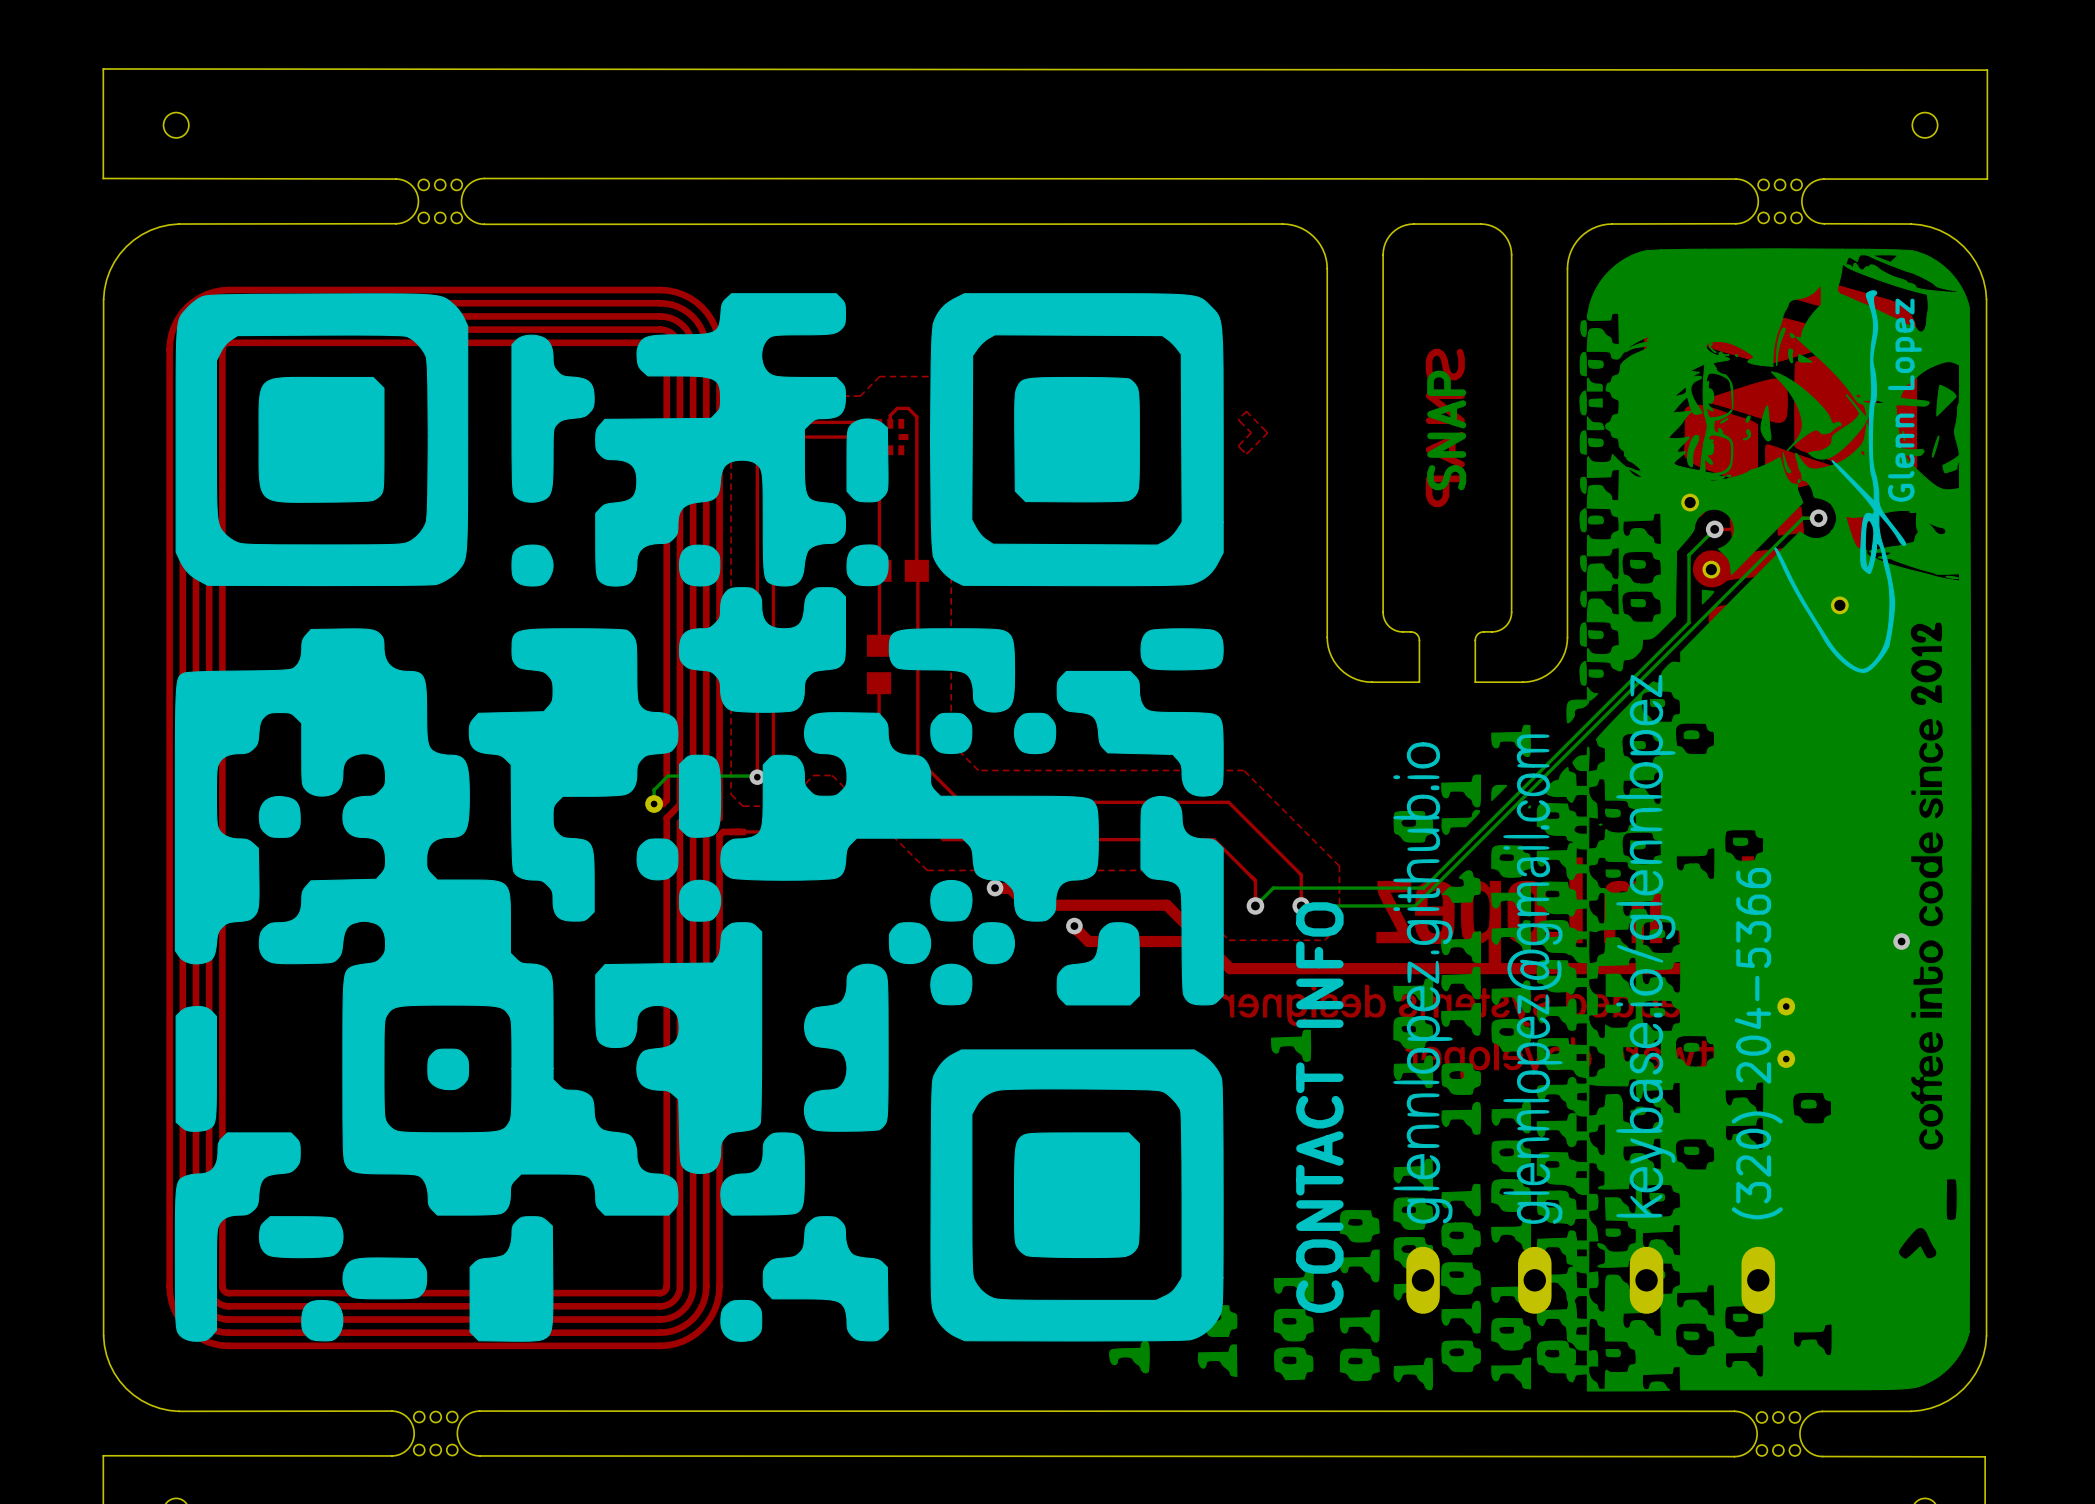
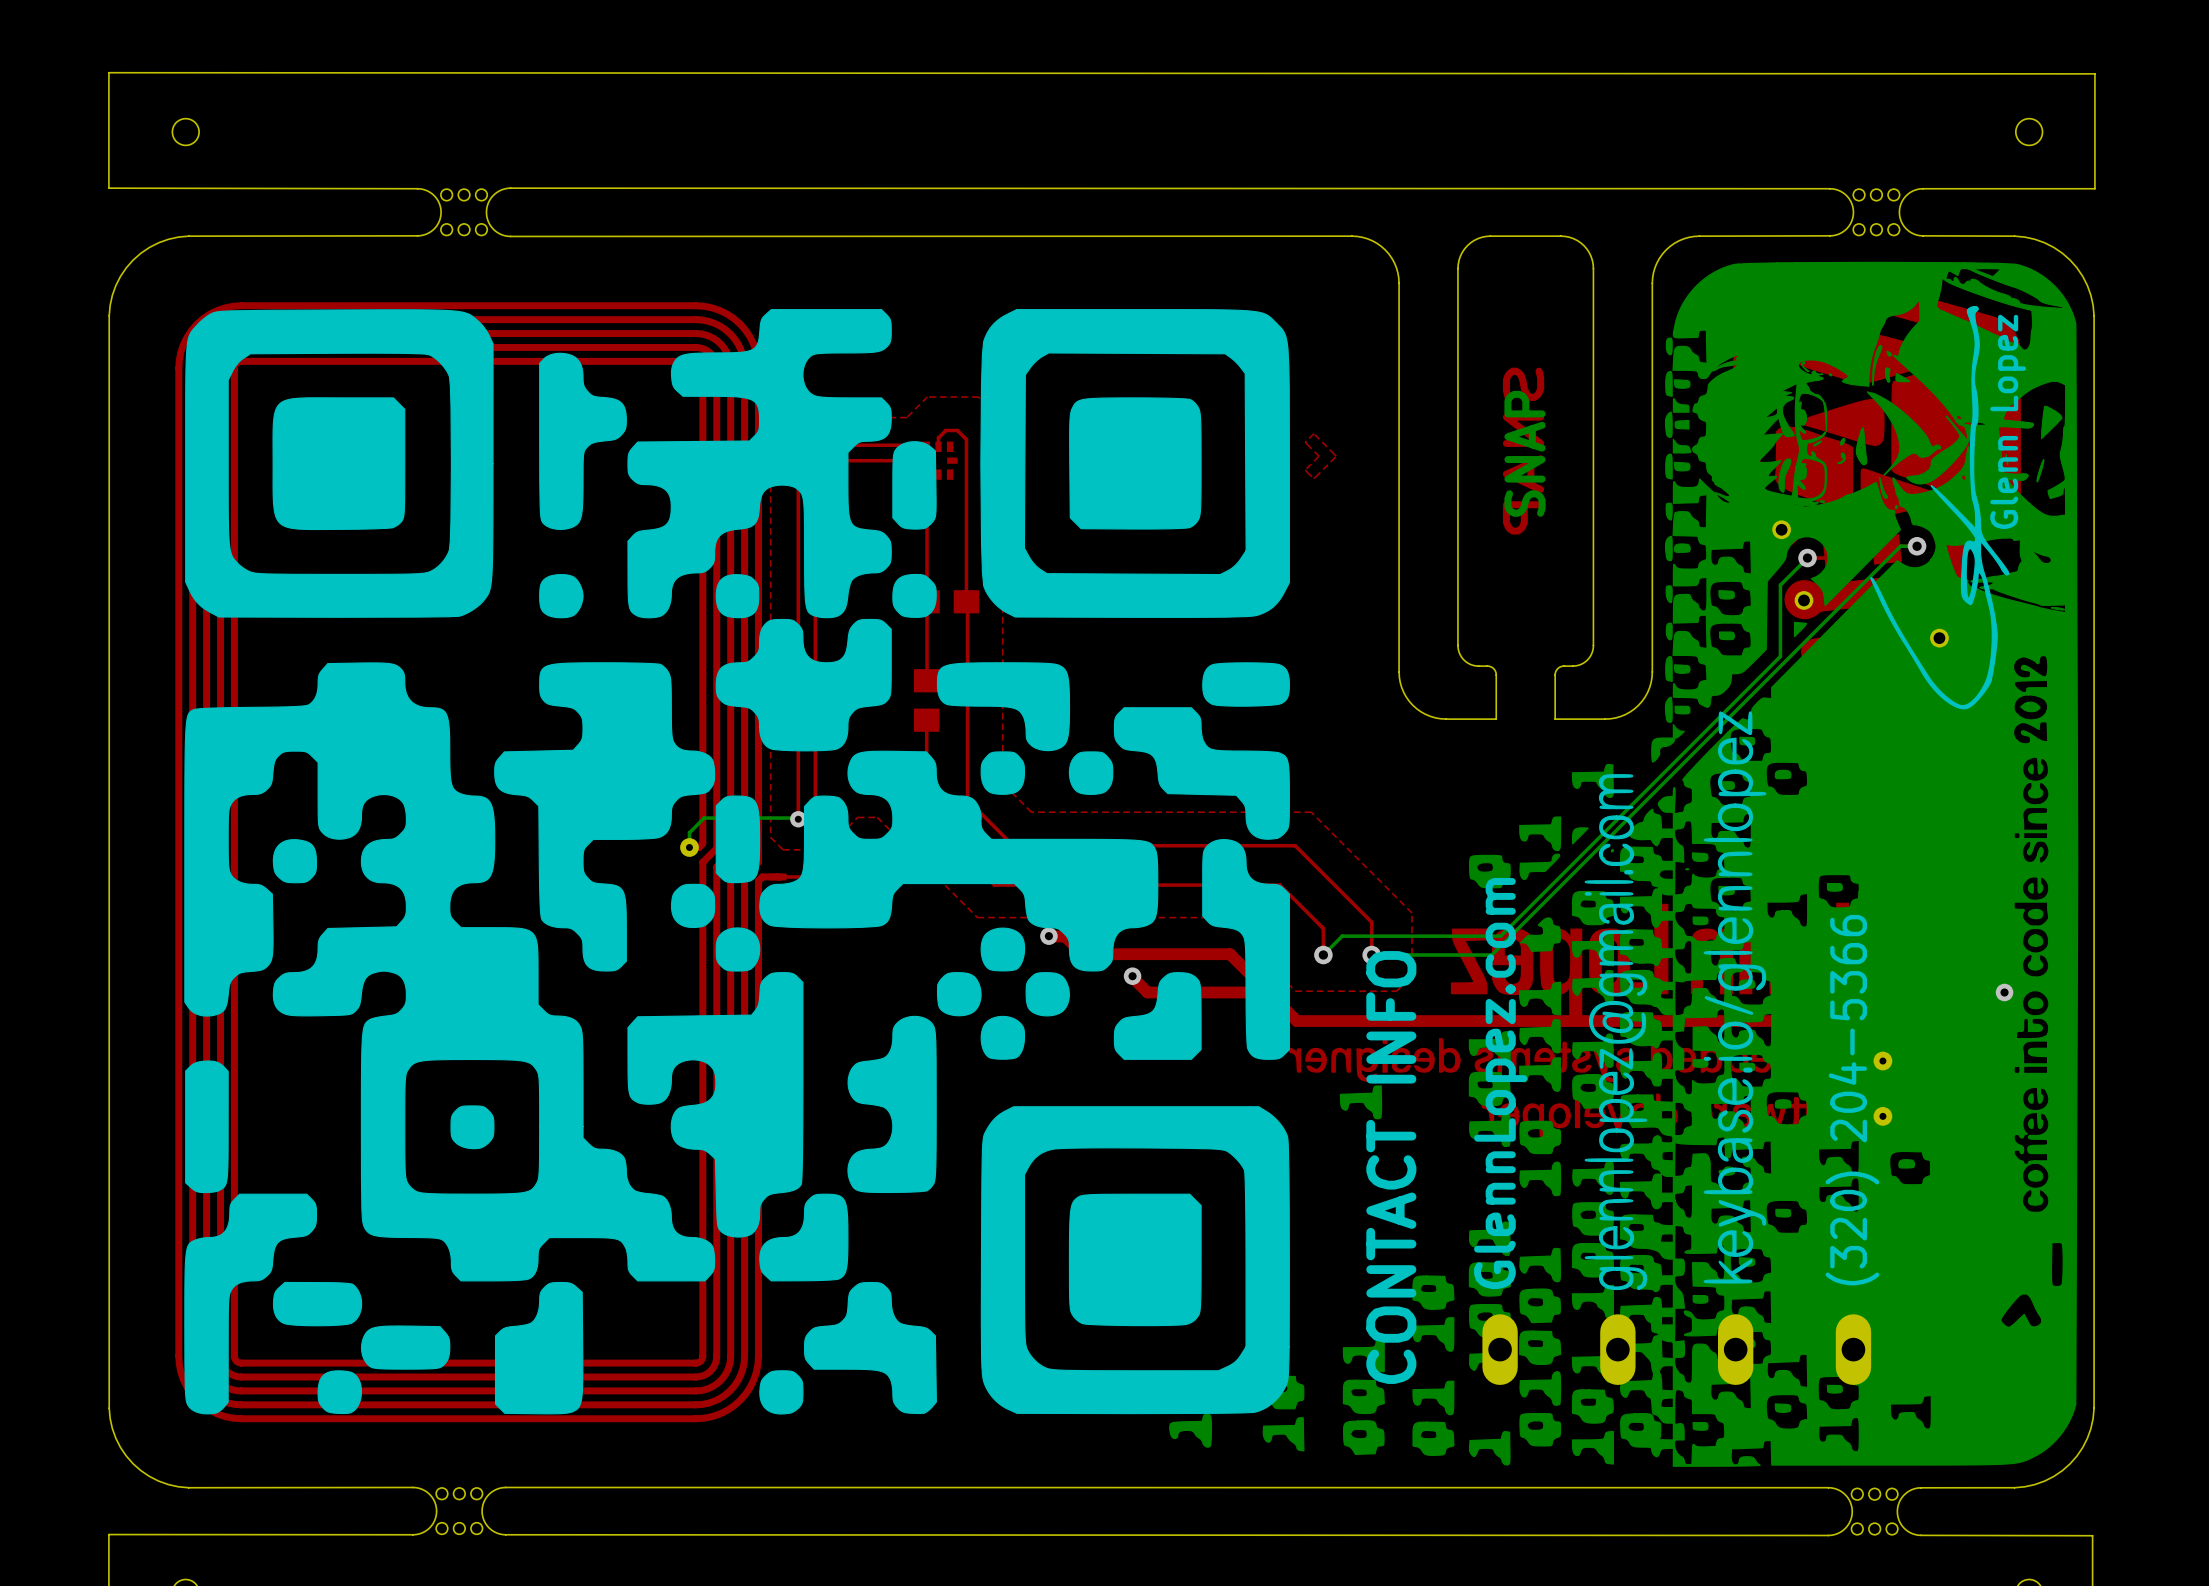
drawing: [1393, 742, 1453, 1224] -> none
text: none -> GlennLopez.com (1500, 1083)

